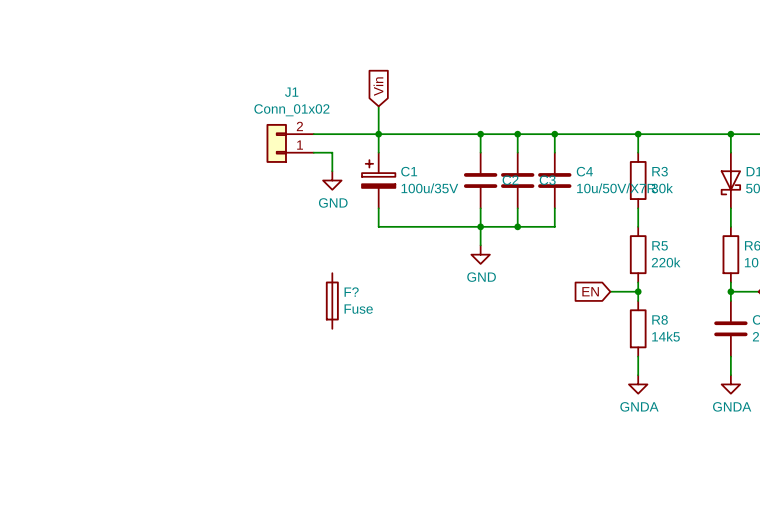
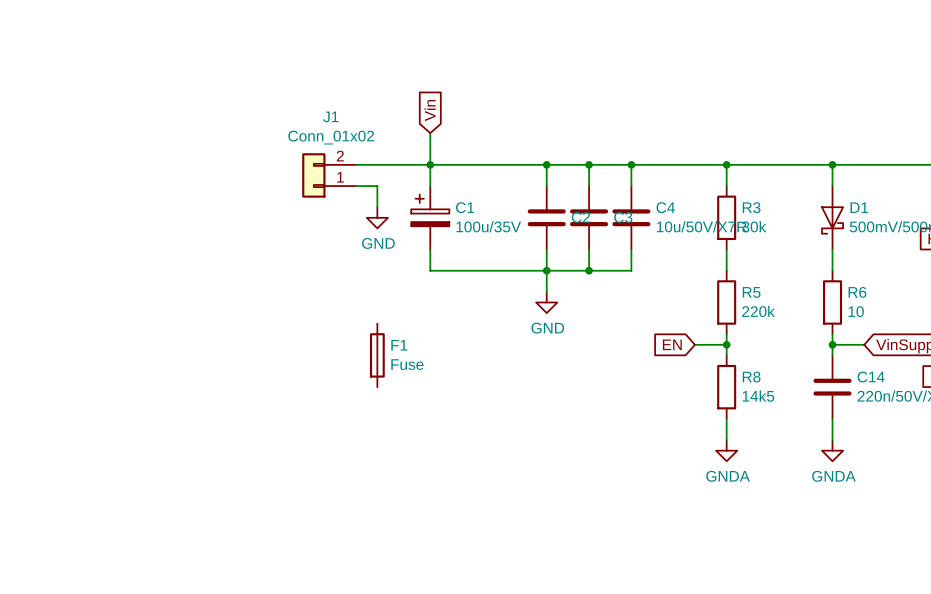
F? name: F? (351, 292) -> F1 (399, 345)

